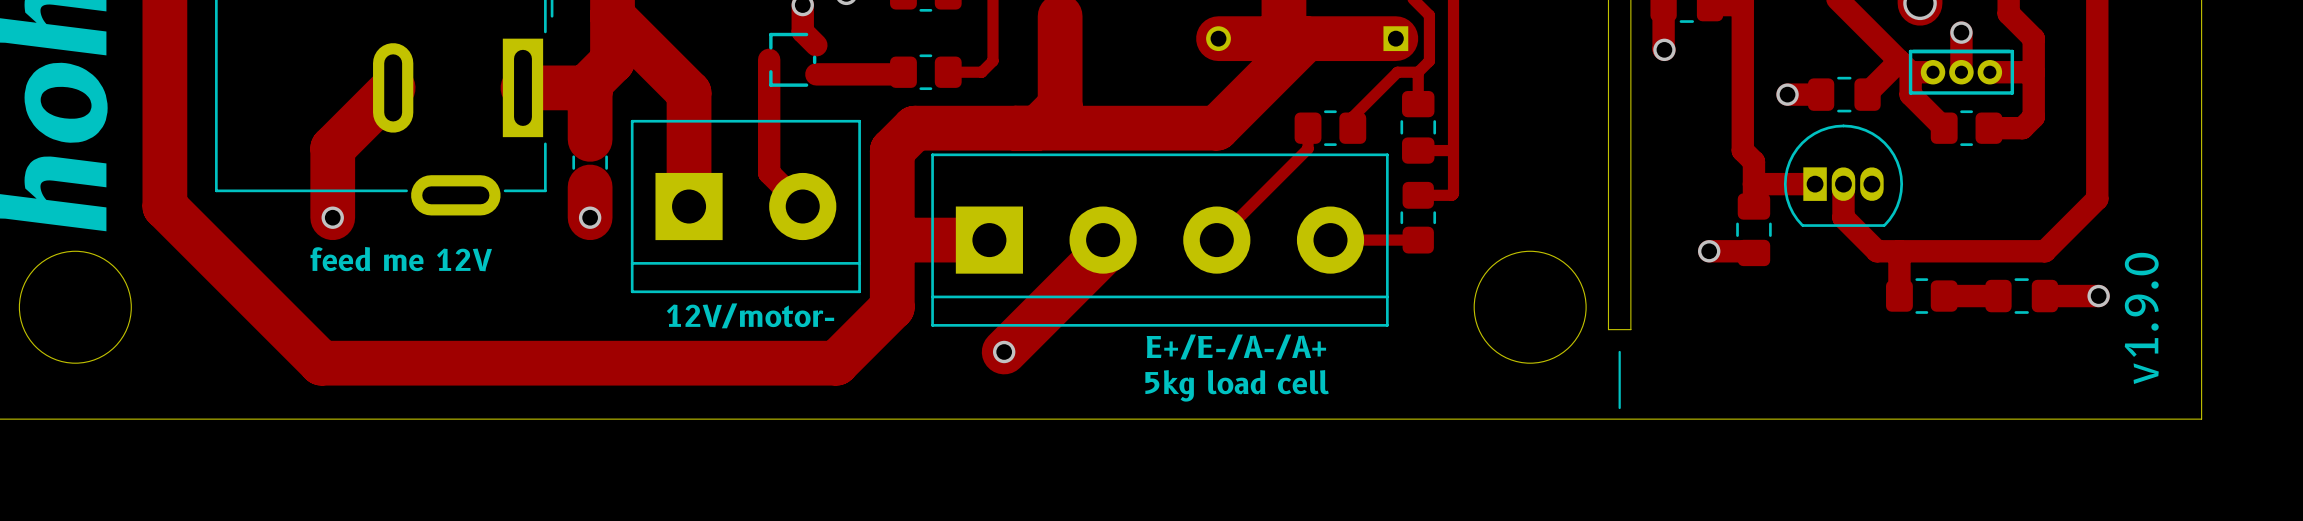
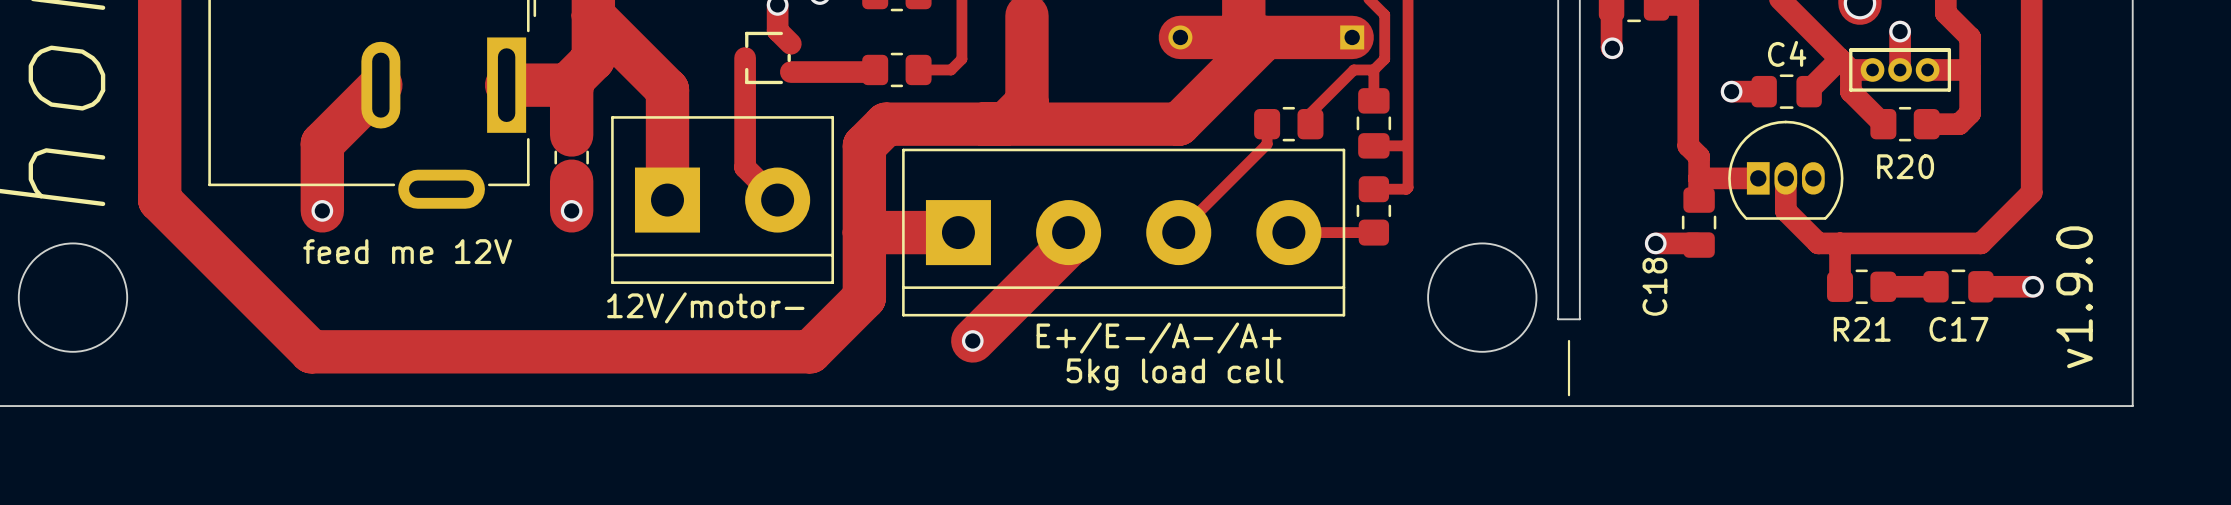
C4 name: none -> C4 (1787, 53)
R20 name: none -> R20 (1905, 166)
C18 name: none -> C18 (1654, 286)
R21 name: none -> R21 (1862, 329)
C17 name: none -> C17 (1958, 329)

